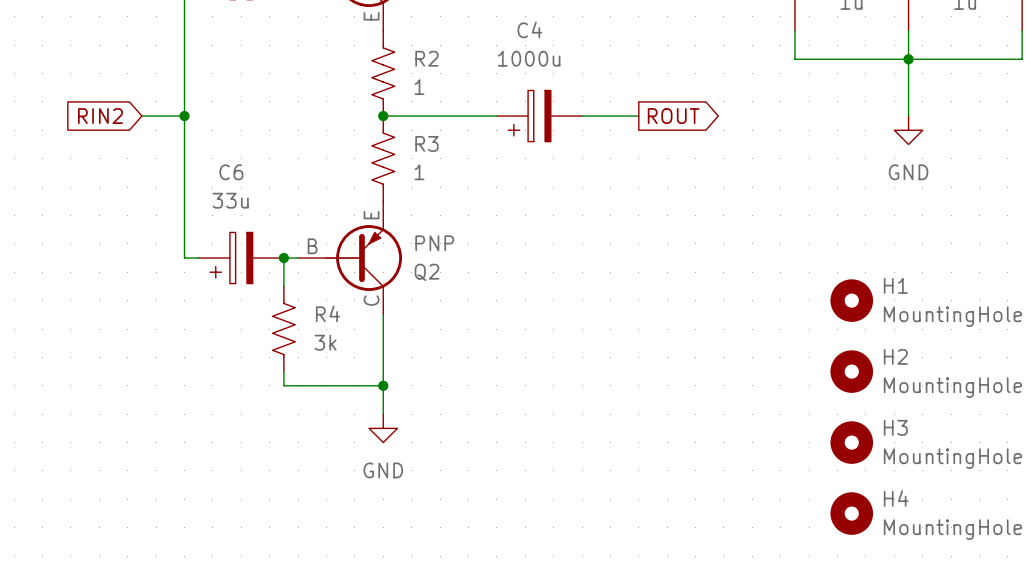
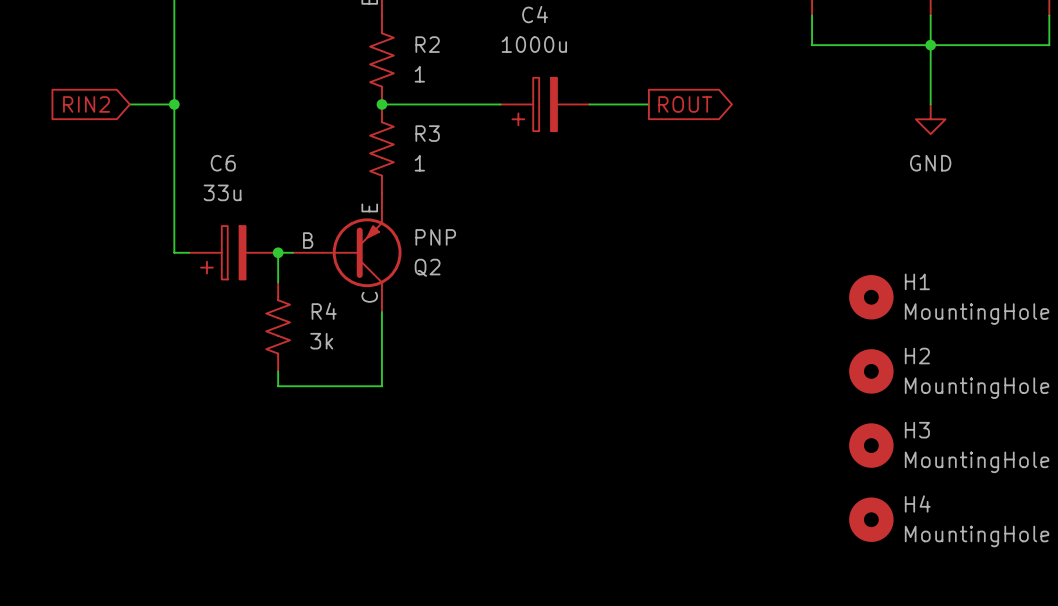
wire: (383, 385) (383, 414) -> none
junction: (383, 385) -> none
power symbol: GND (383, 428) -> none

